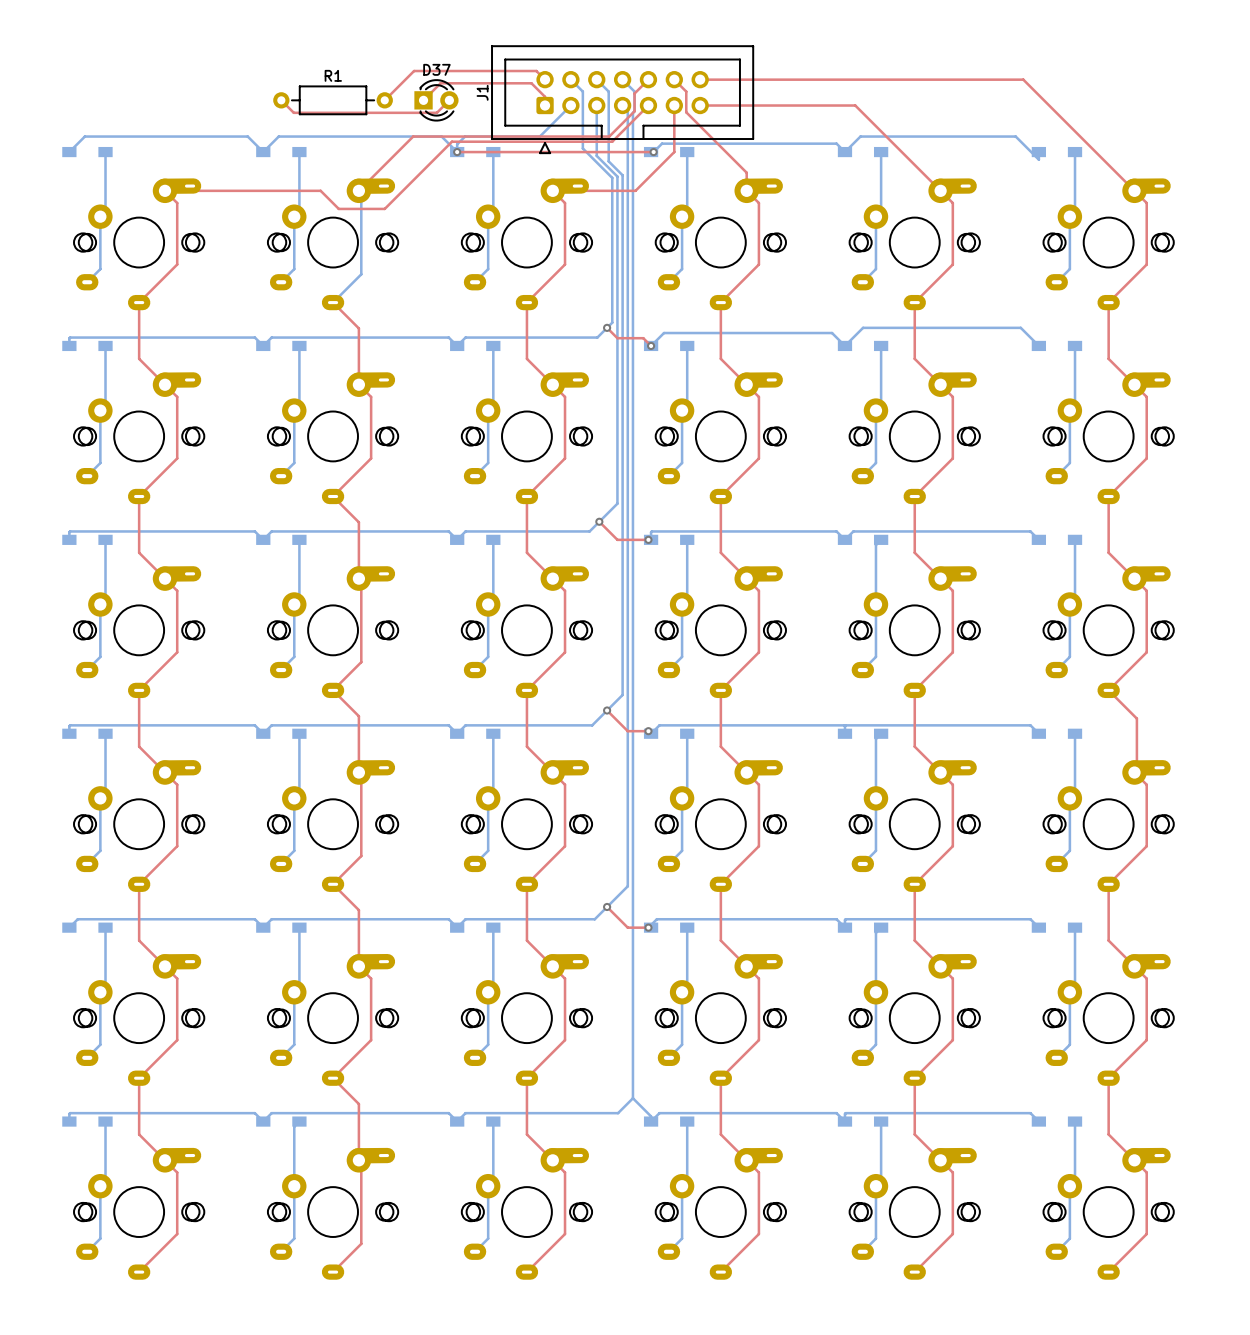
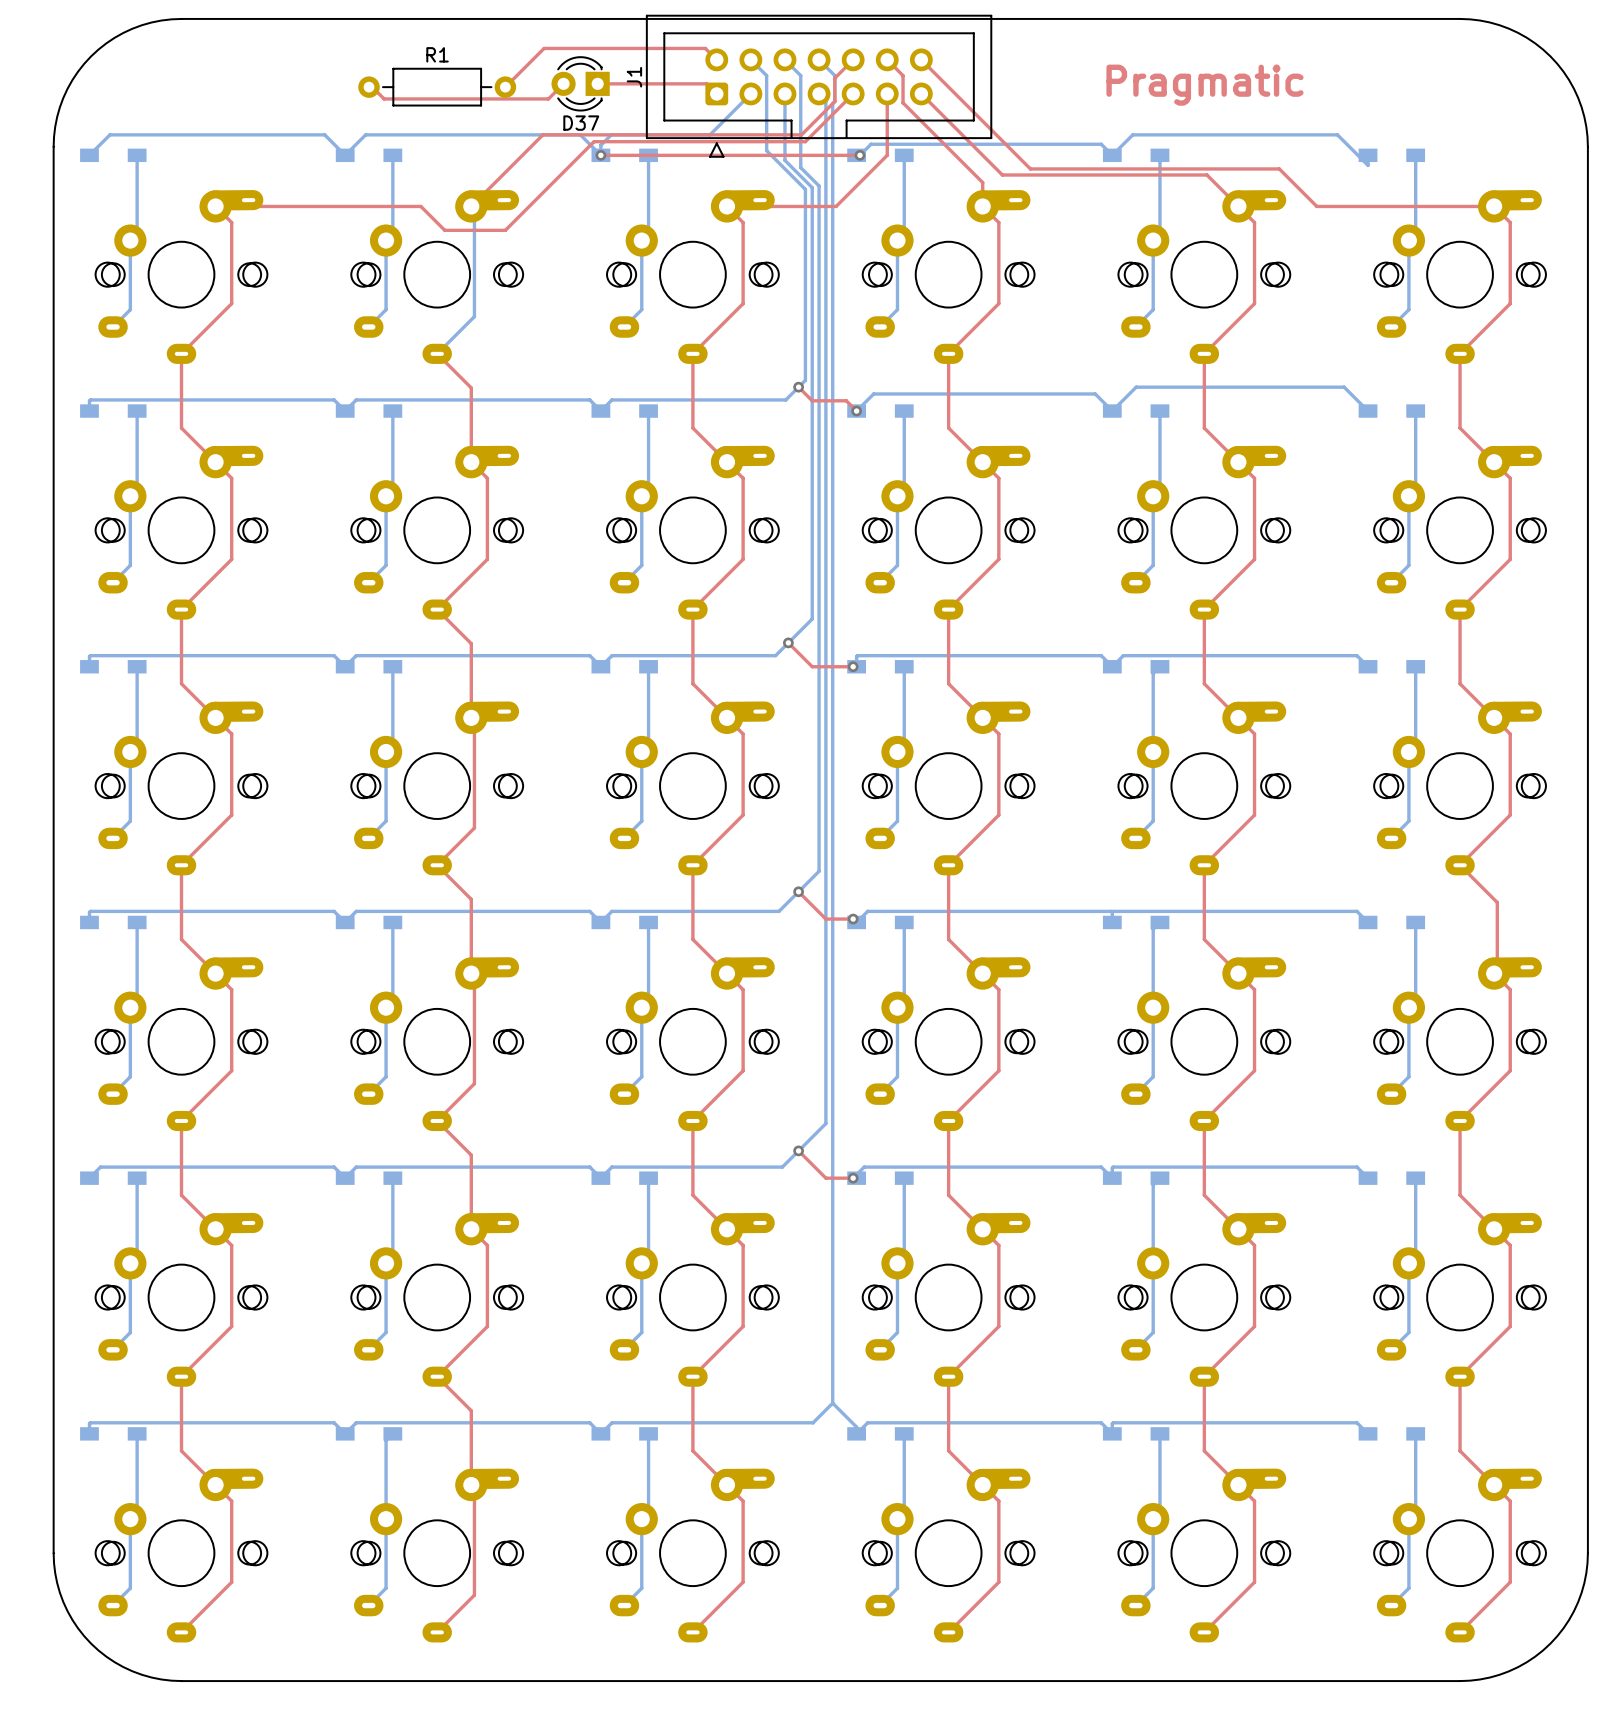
board edge: none -> (181, 18) (1460, 18) (1480, 20) (1508, 28) (1535, 43) (1557, 63) (1569, 80) (1578, 97) (1584, 116) (1587, 146) (1587, 1553) (1584, 1583) (1578, 1602) (1563, 1628) (1543, 1650) (1526, 1662) (1508, 1671) (1489, 1677) (1460, 1681) (181, 1681) (151, 1677) (132, 1671) (106, 1656) (84, 1636) (72, 1620) (59, 1592) (55, 1573) (53, 1553) (54, 136) (57, 116) (67, 88) (84, 63) (98, 49) (114, 37) (132, 28) (161, 20) (181, 18)
top track: (700, 79) (1023, 79) (1134, 190) -> (921, 59) (1030, 168) (1279, 168) (1316, 206) (1494, 206)
top track: none -> (369, 83) (384, 98) (548, 98) (563, 83)
text: none -> Pragmatic (1204, 85)
top track: (281, 100) (293, 112) (436, 112) (449, 100) -> none
top track: (423, 100) (440, 83) (531, 83) (545, 96) (545, 105) -> (597, 83) (706, 83) (716, 93)
D37 rotation: 0° (436, 100) -> 180° (580, 83)
top track: (700, 105) (855, 105) (916, 166) -> (921, 93) (1002, 175) (1206, 175)

